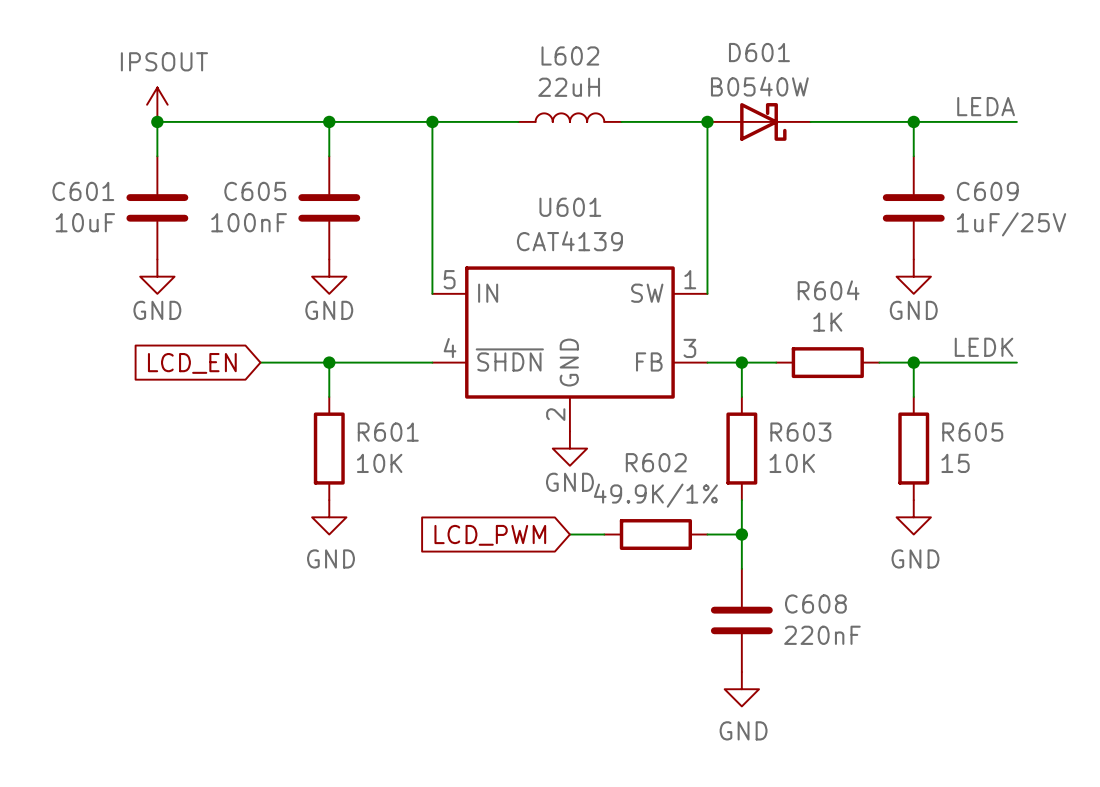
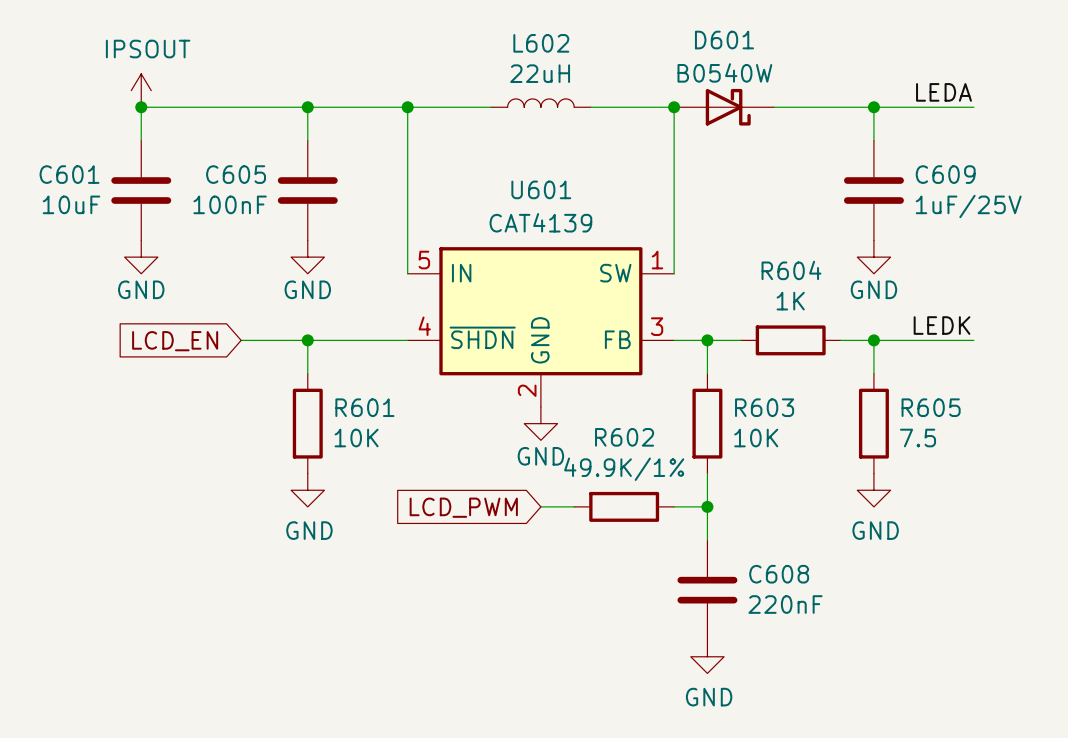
R605 value: 15 (955, 463) -> 7.5 (918, 438)

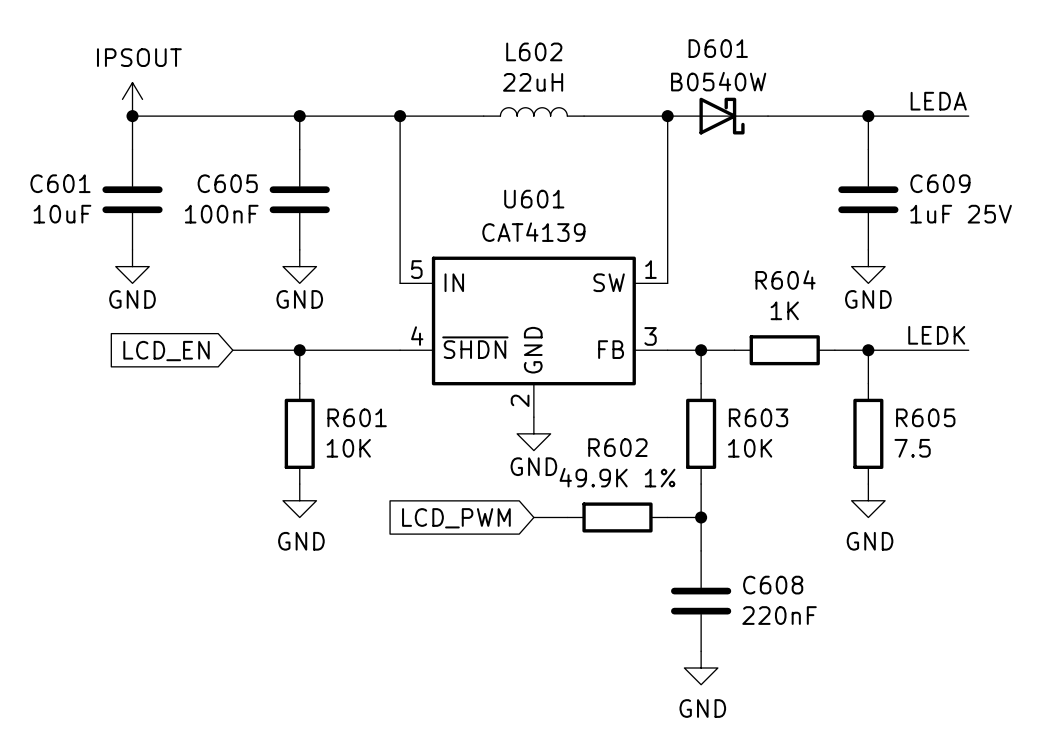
C609 value: 1uF/25V (968, 206) -> 1uF 25V (961, 214)
R602 value: 49.9K/1% (624, 469) -> 49.9K 1% (617, 477)

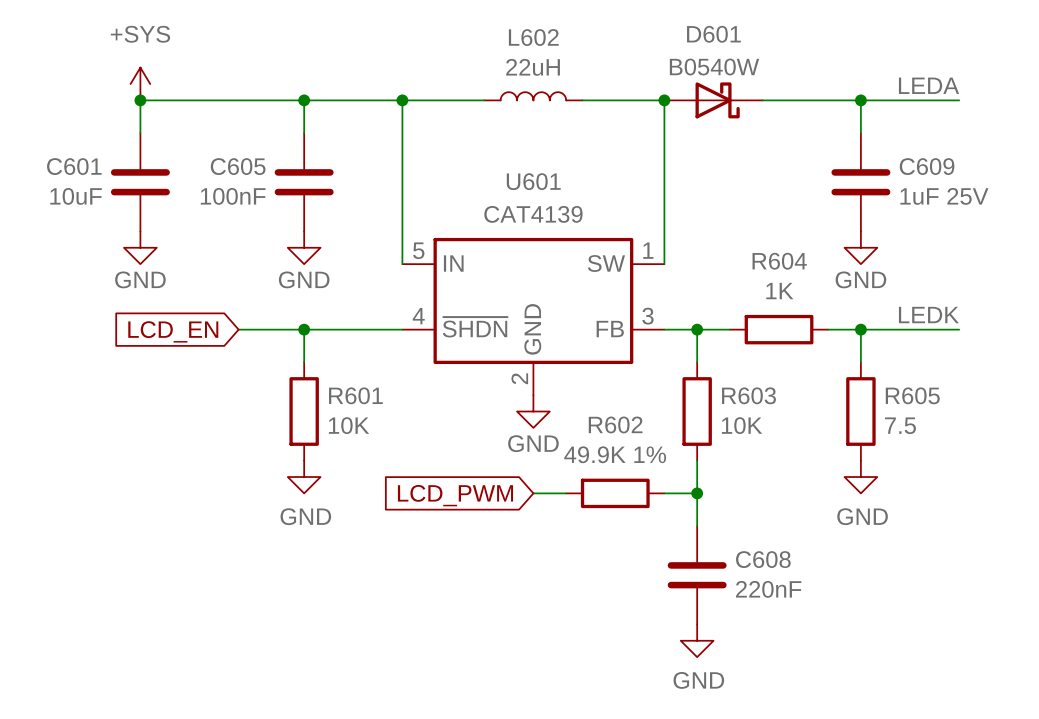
power symbol: IPSOUT (132, 99) -> +SYS (140, 84)

